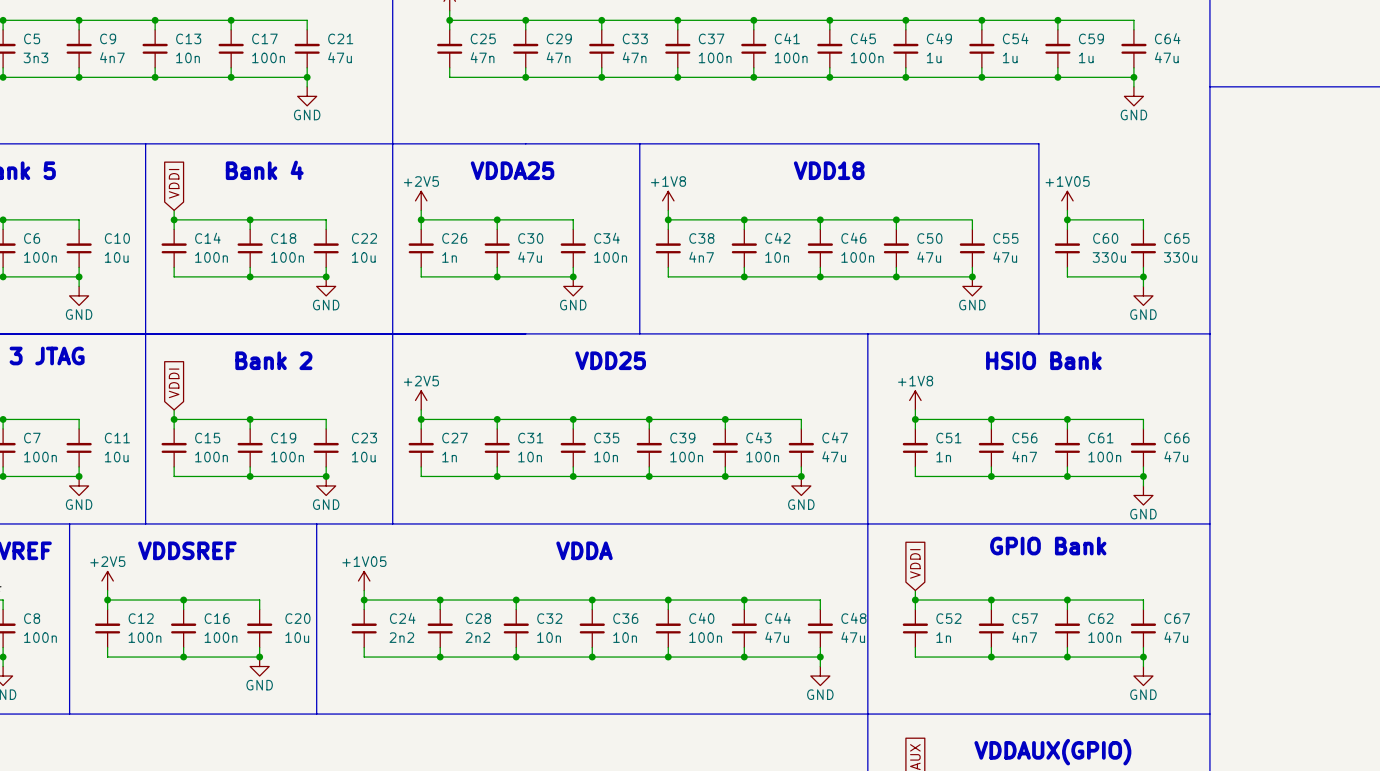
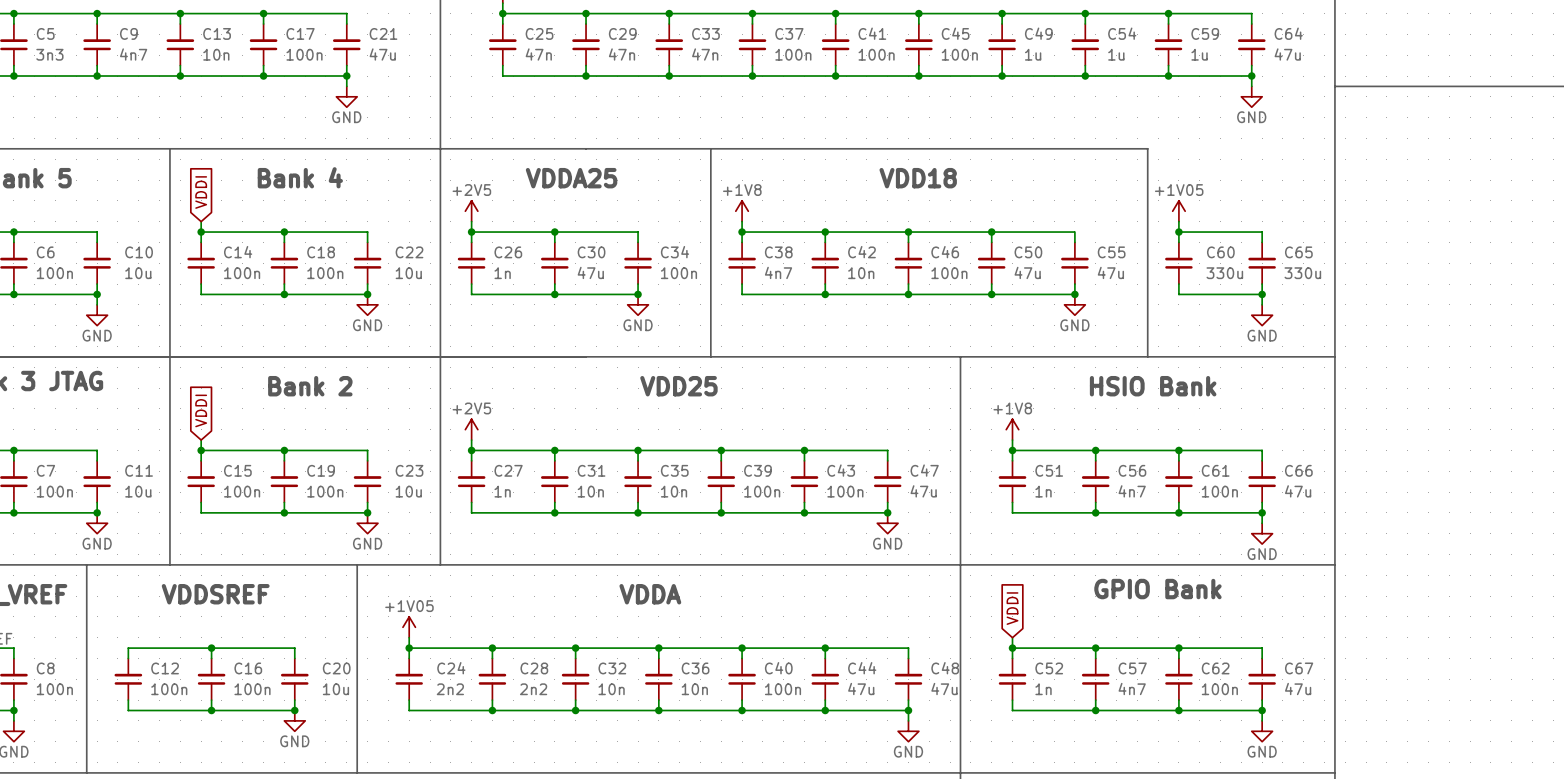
power symbol: +2V5 (107, 580) -> none
wire: (107, 590) (107, 600) -> none
junction: (107, 600) -> none

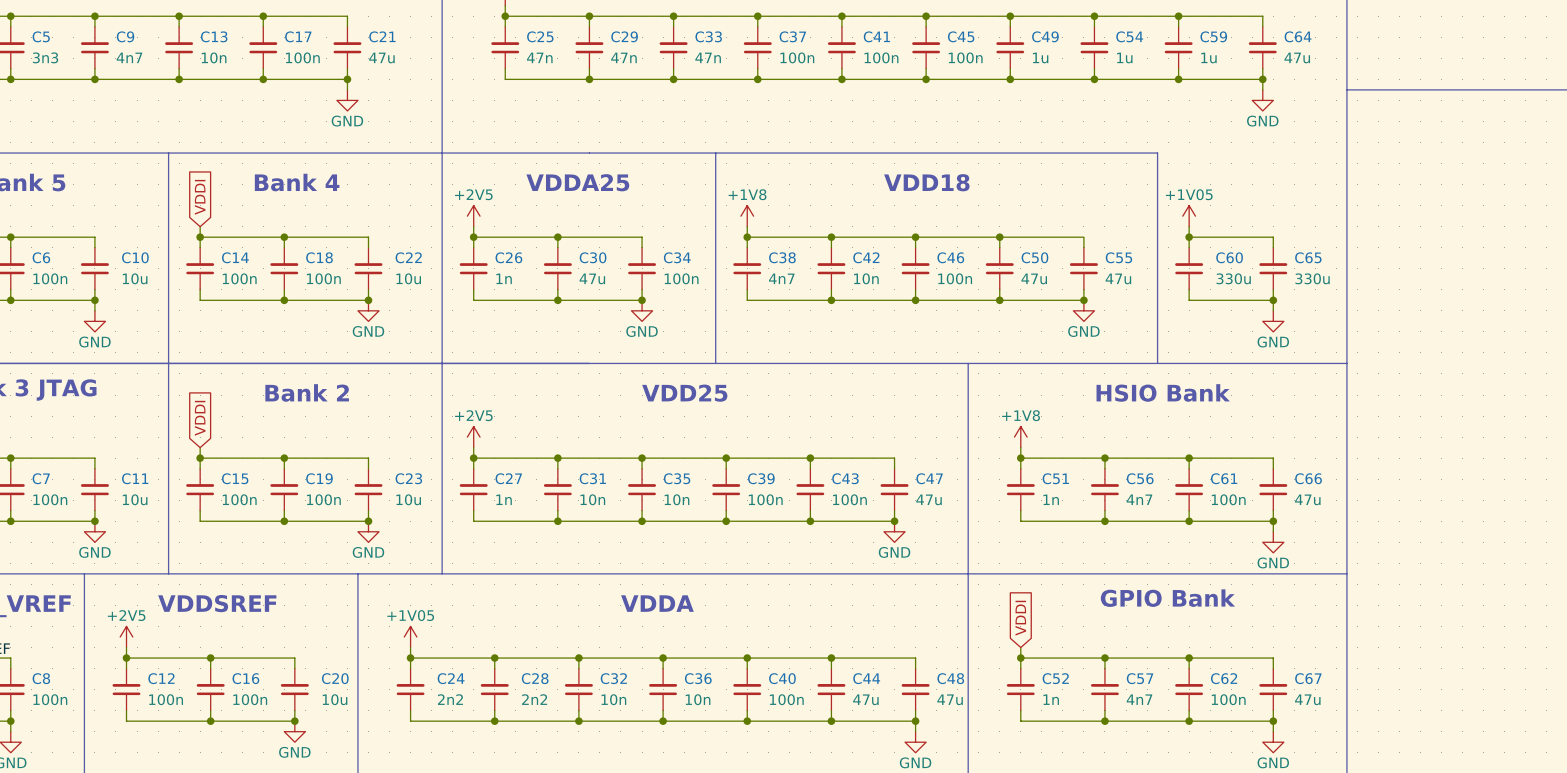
power symbol: none -> +2V5 (126, 636)
wire: none -> (126, 647) (126, 658)
junction: none -> (126, 658)

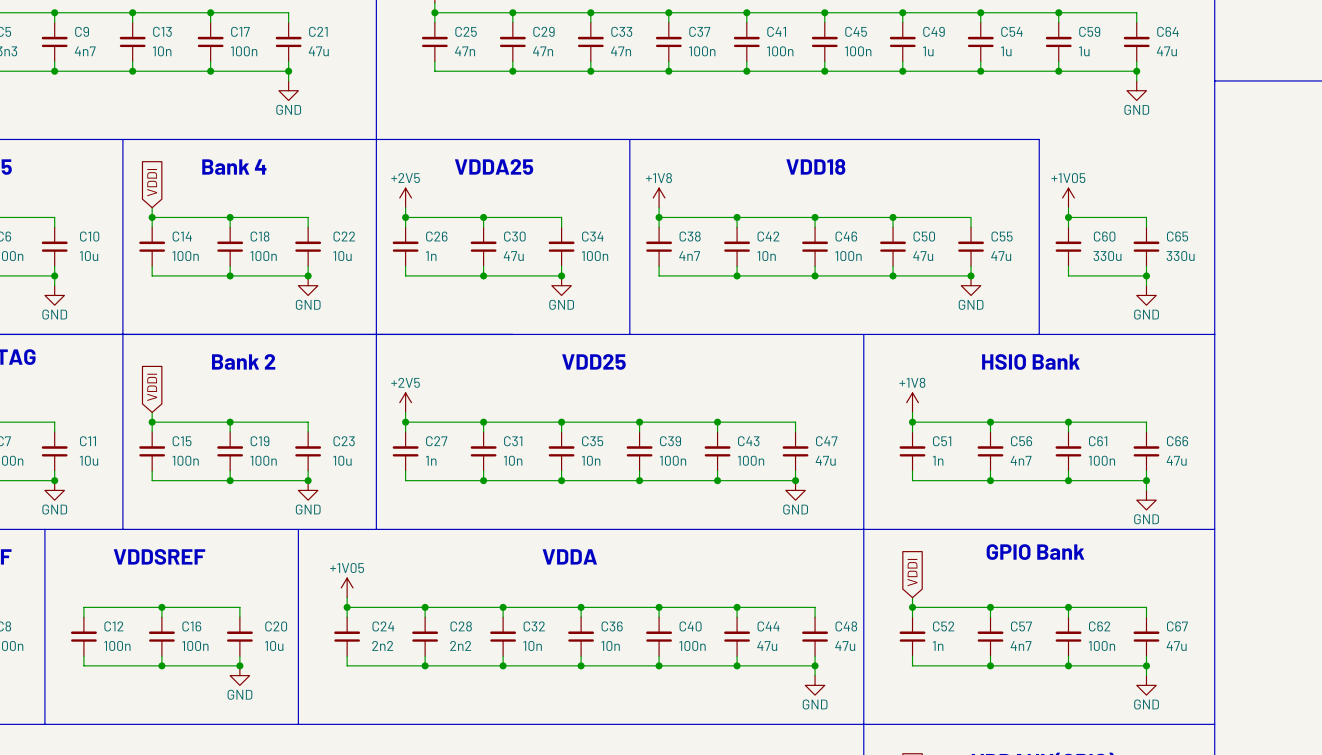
power symbol: +2V5 (126, 636) -> none
wire: (126, 647) (126, 658) -> none
junction: (126, 658) -> none

